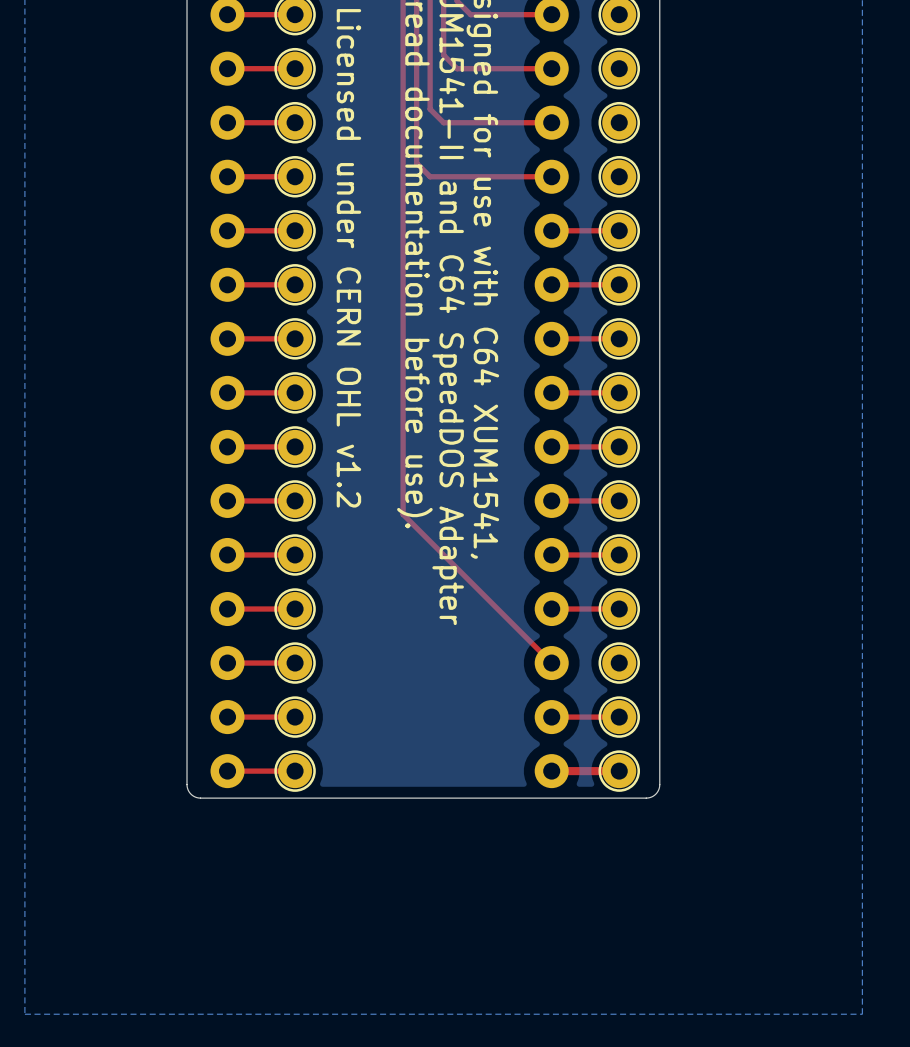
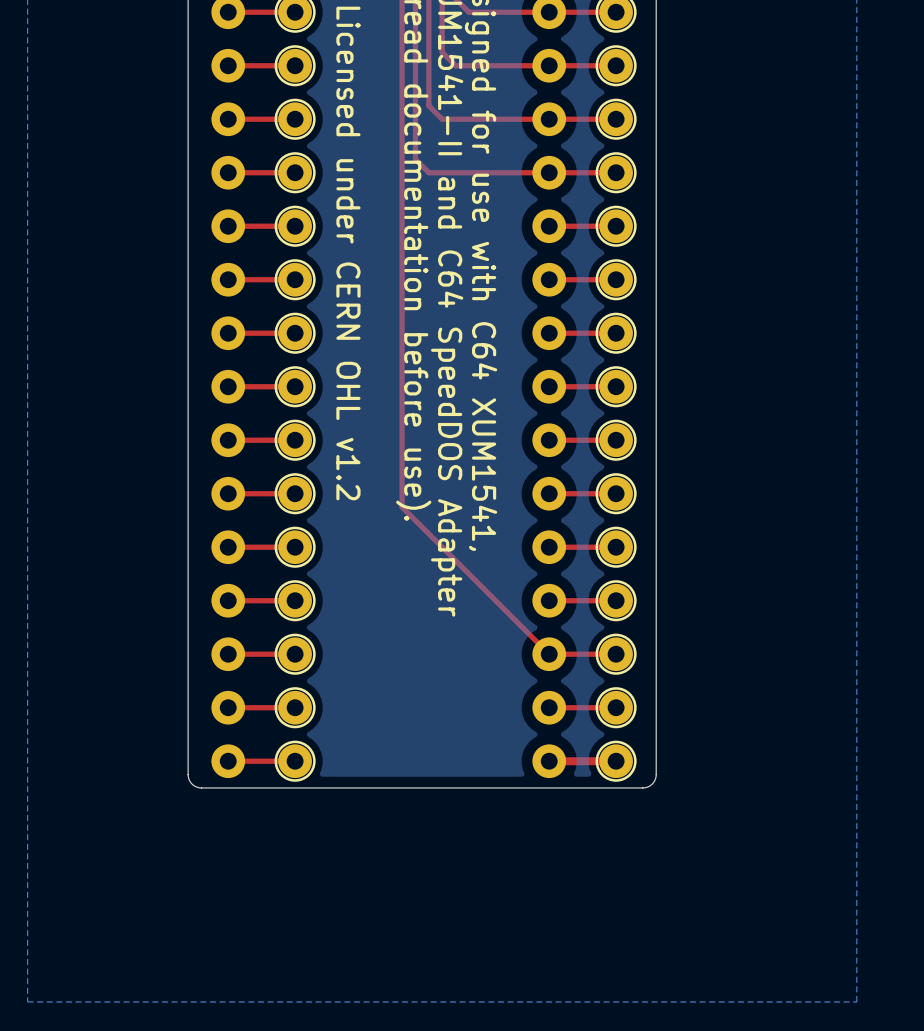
top track: none -> (616, 12) (549, 12)
top track: none -> (616, 65) (549, 65)
top track: none -> (616, 119) (549, 119)
top track: none -> (616, 172) (549, 172)
top track: none -> (616, 654) (549, 654)

